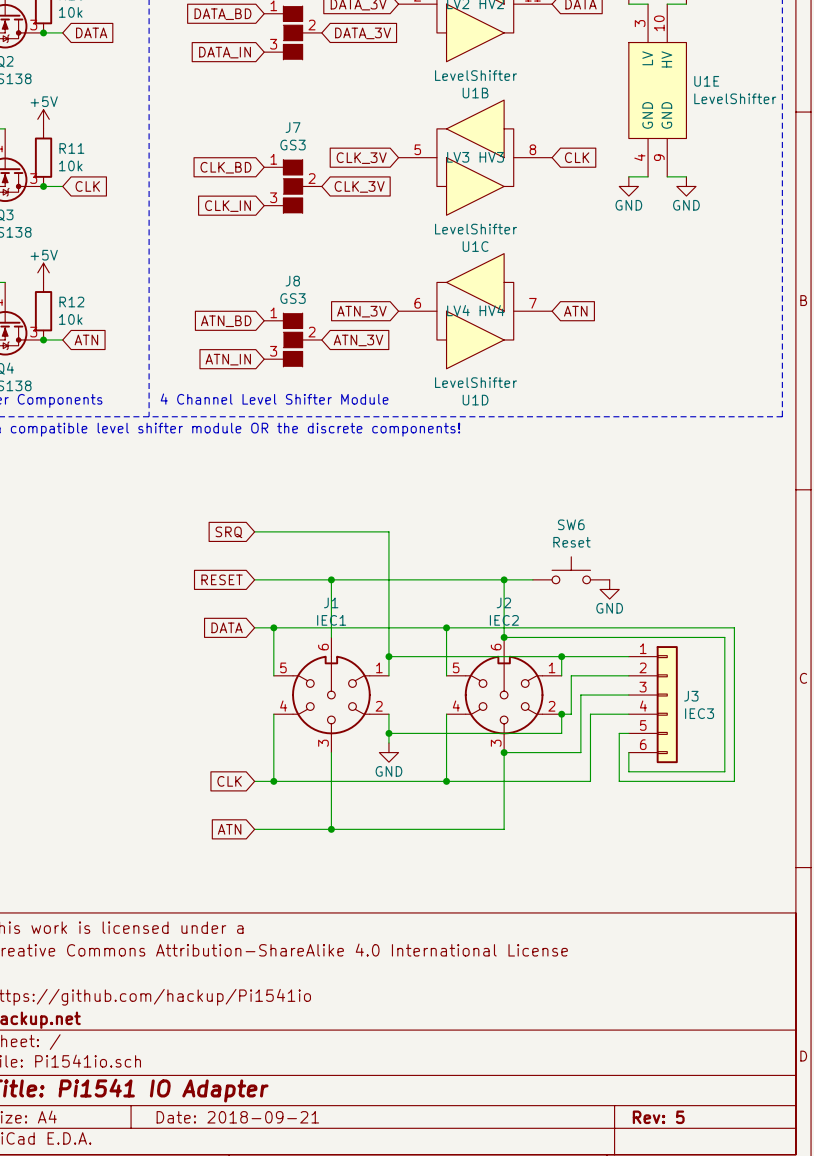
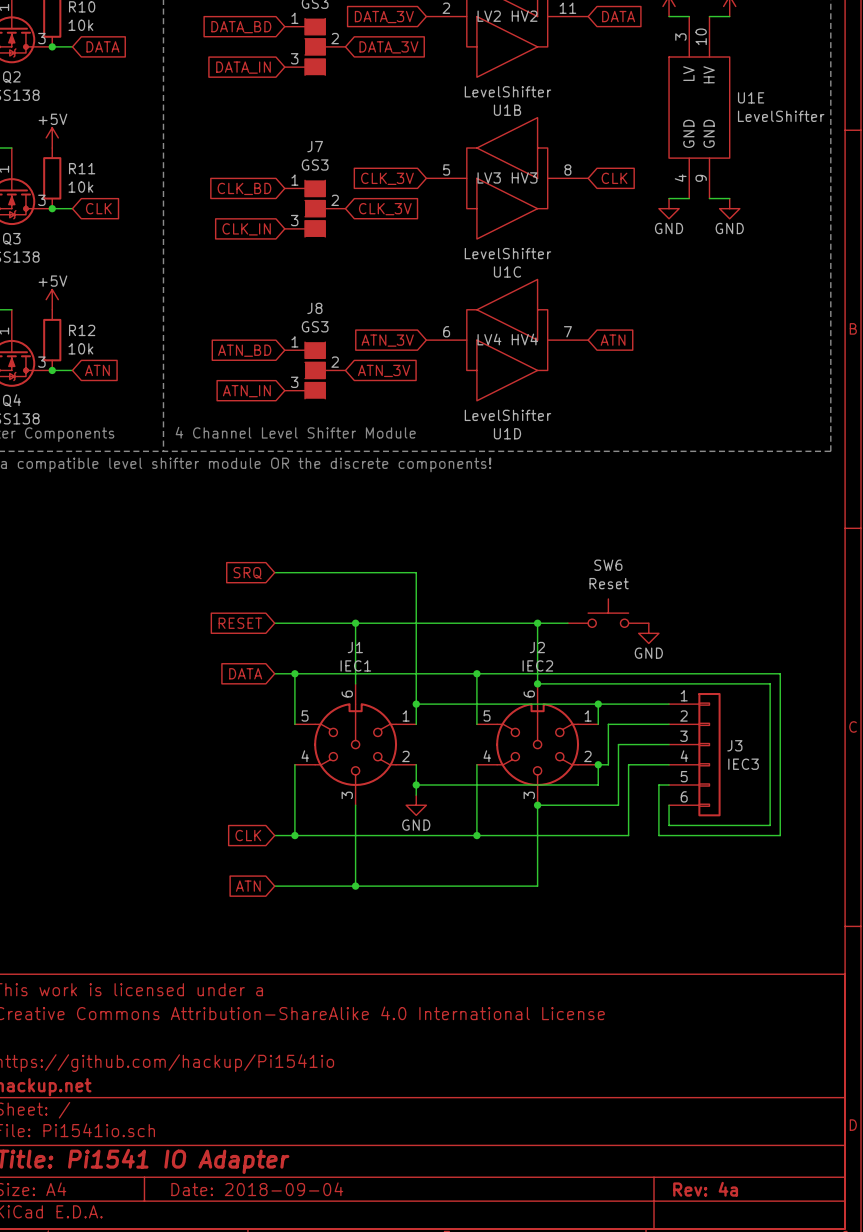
title block: Date: 2018-09-21 (237, 1117) -> Date: 2018-09-04 (257, 1189)
title block: Rev: 5 (658, 1117) -> Rev: 4a (705, 1189)

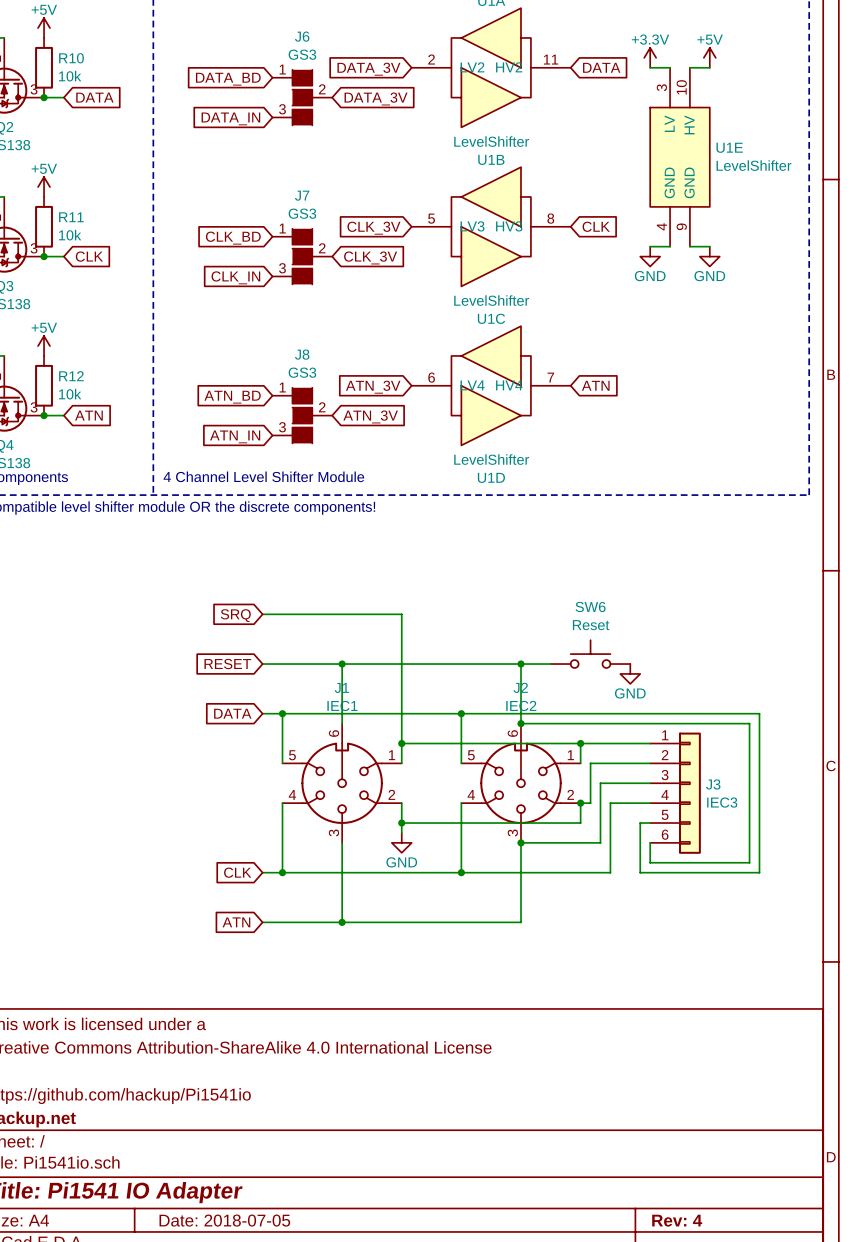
title block: Date: 2018-09-04 (257, 1189) -> Date: 2018-07-05 (224, 1220)
title block: Rev: 4a (705, 1189) -> Rev: 4 (677, 1220)

